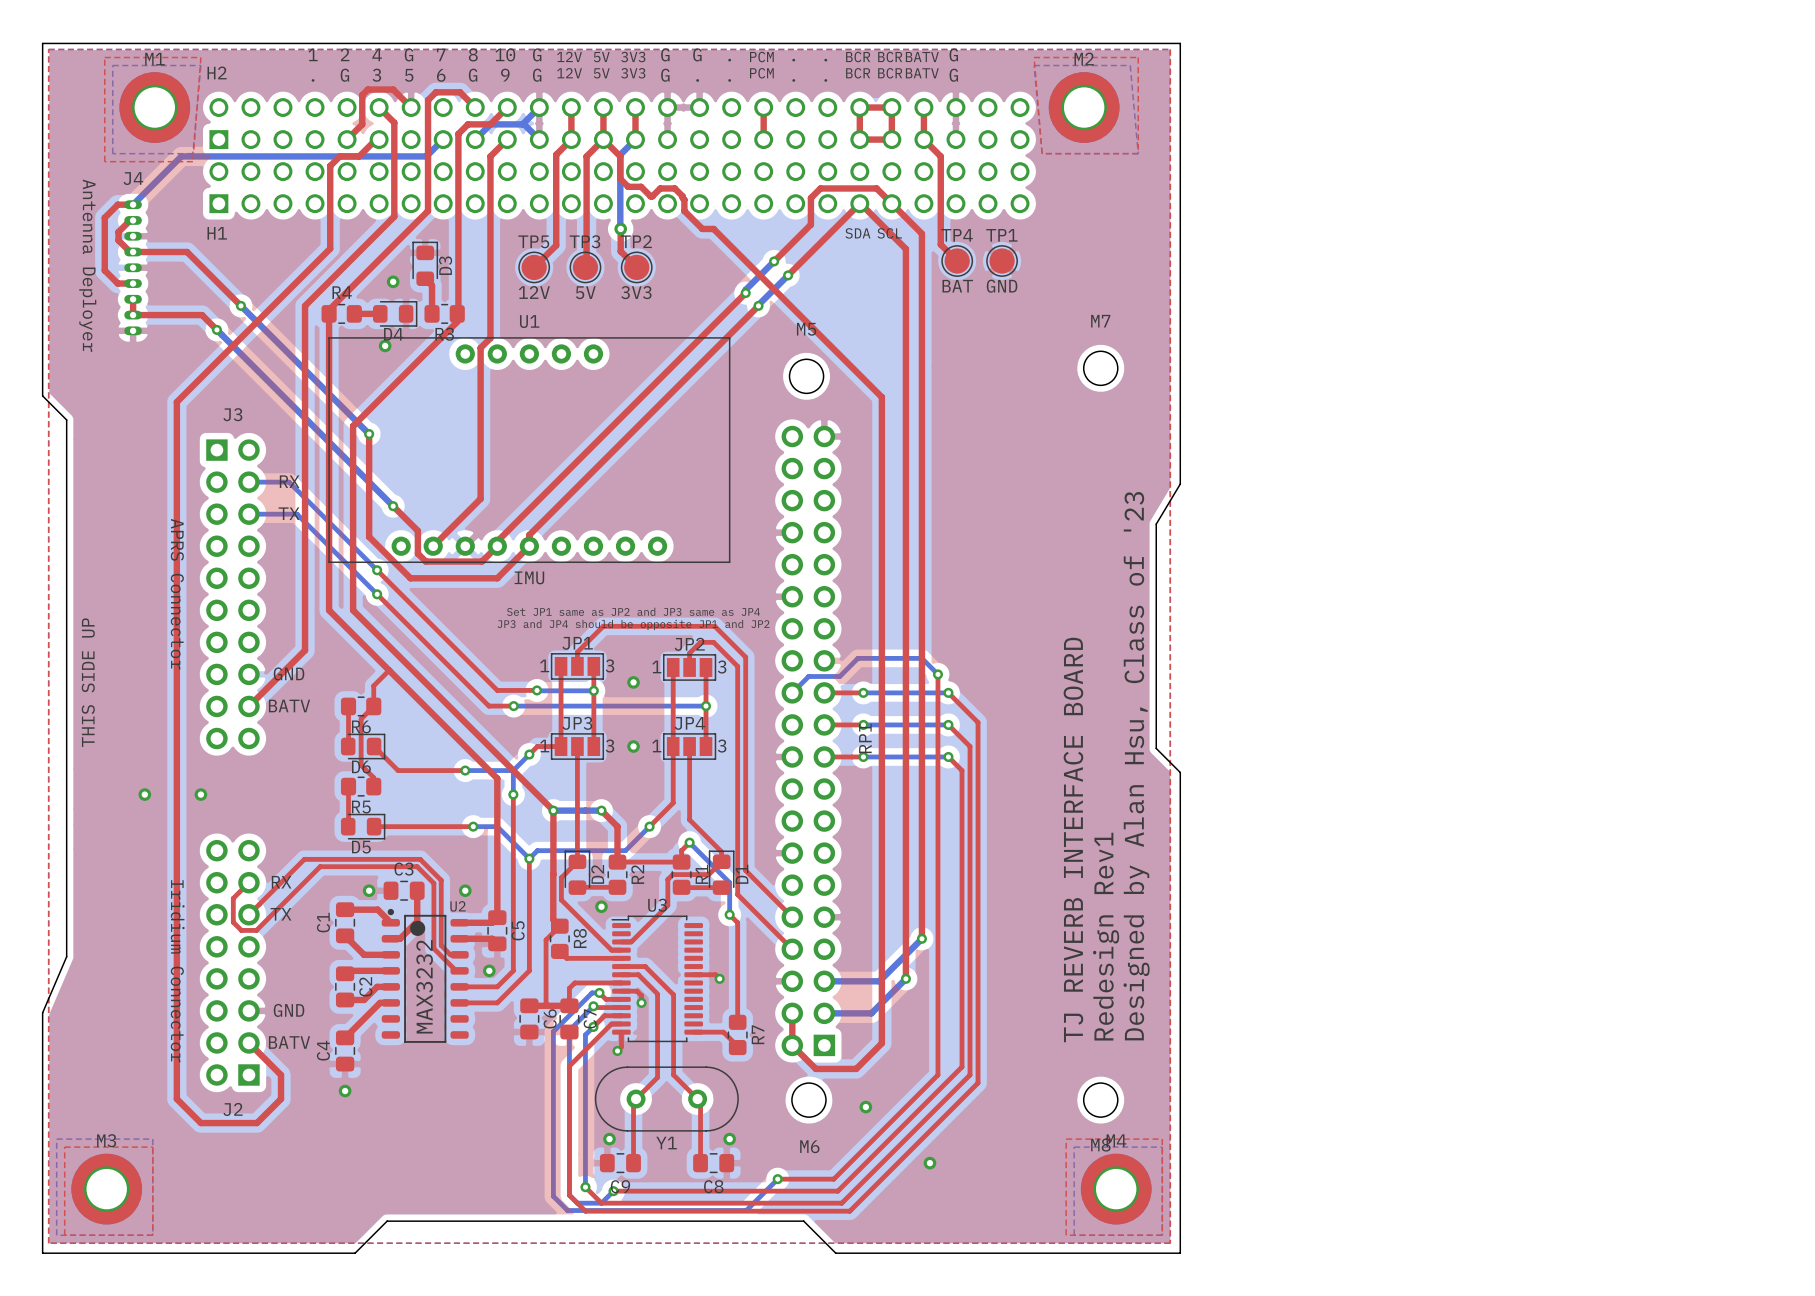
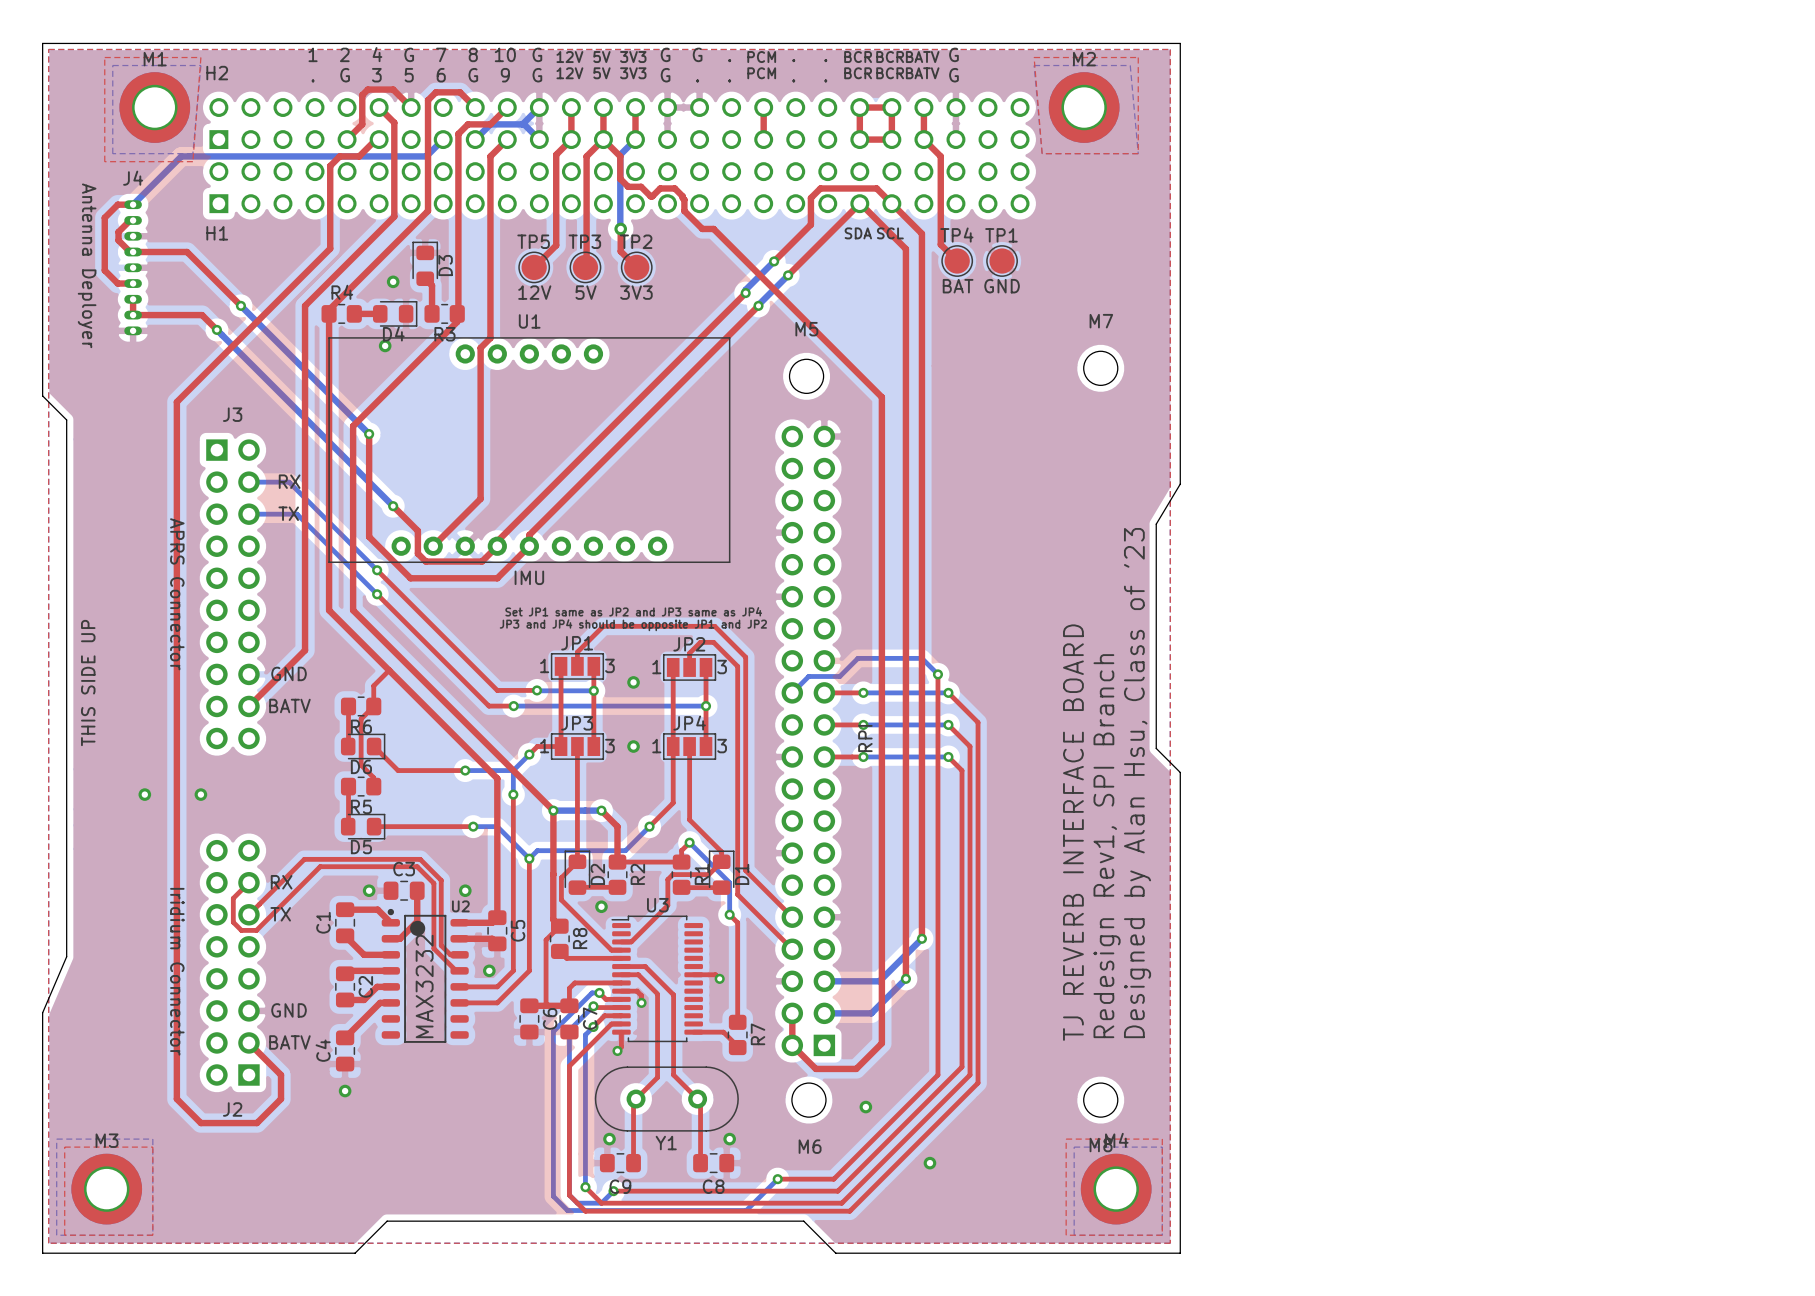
text: Redesign Rev1 (1106, 936) -> Redesign Rev1, SPI Branch (1107, 846)

